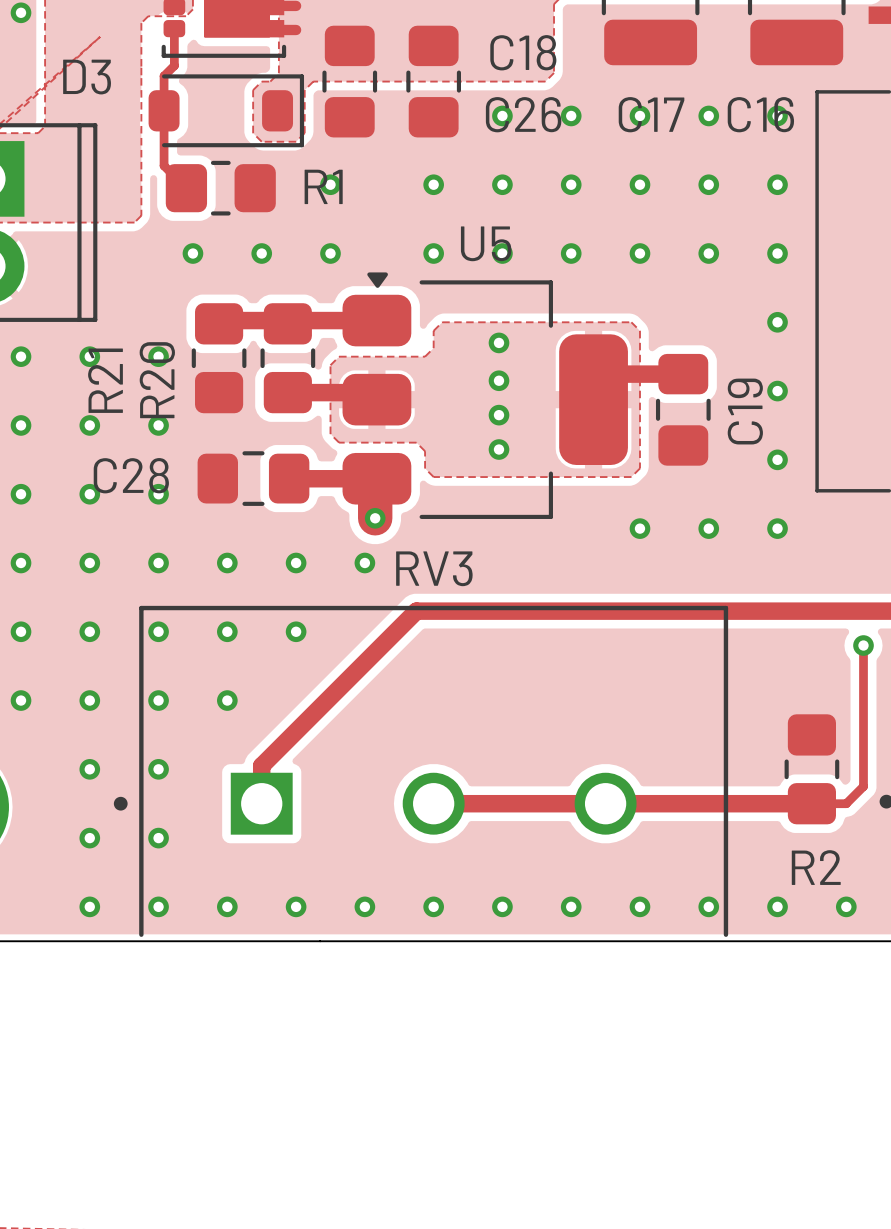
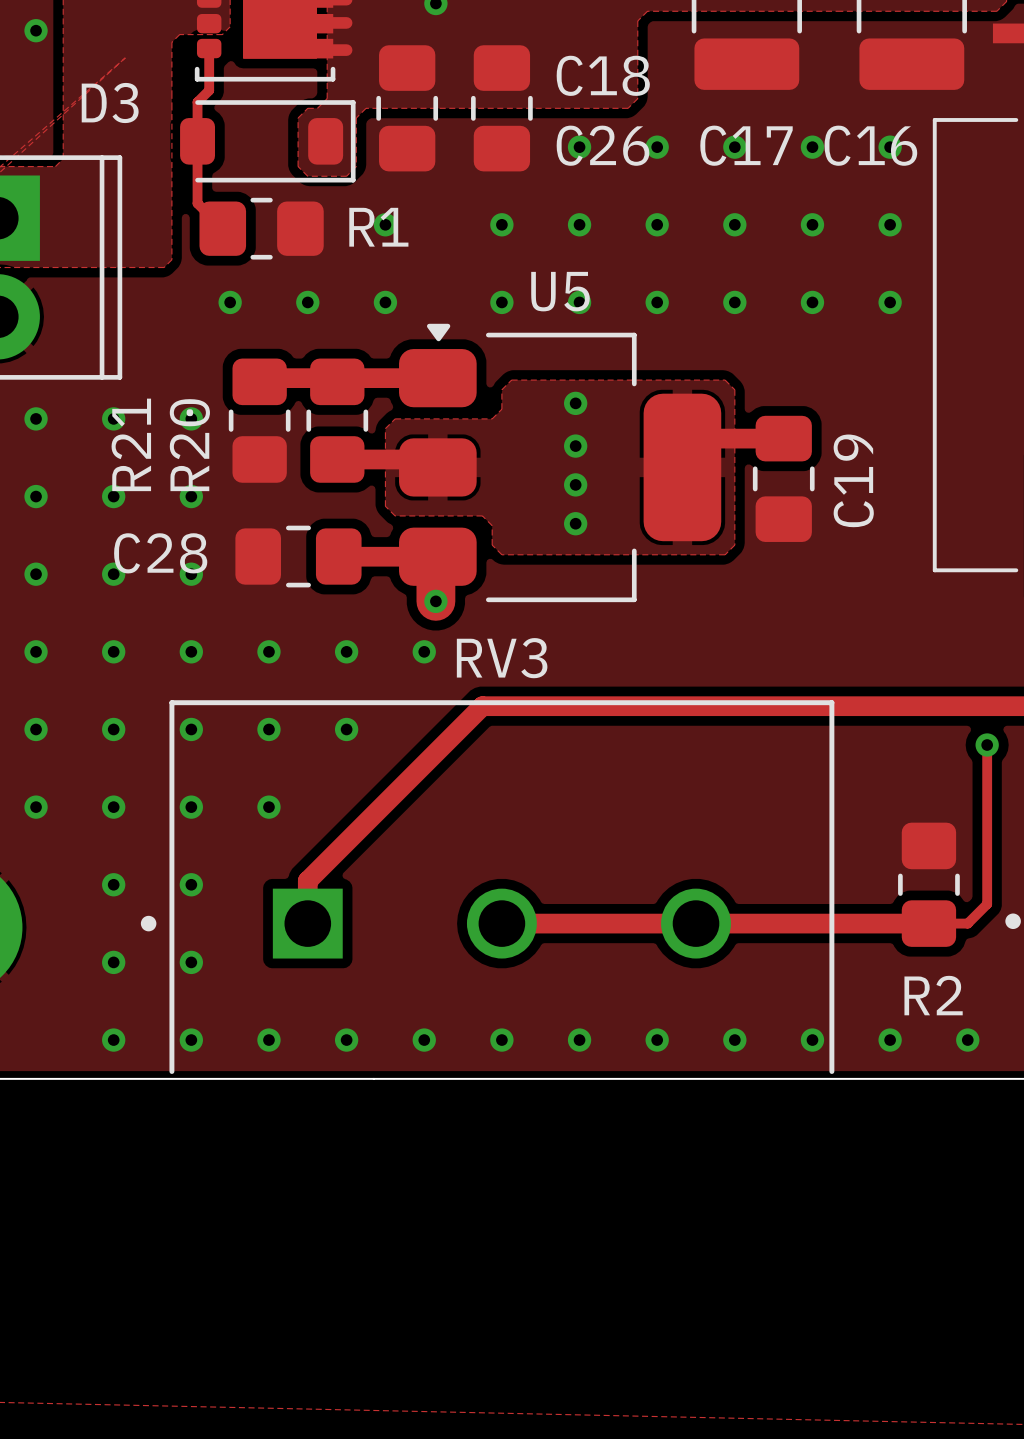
via: (777, 322) -> none
via: (777, 391) -> none
via: (777, 459) -> none
via: (639, 528) -> none
via: (708, 528) -> none
via: (777, 528) -> none

